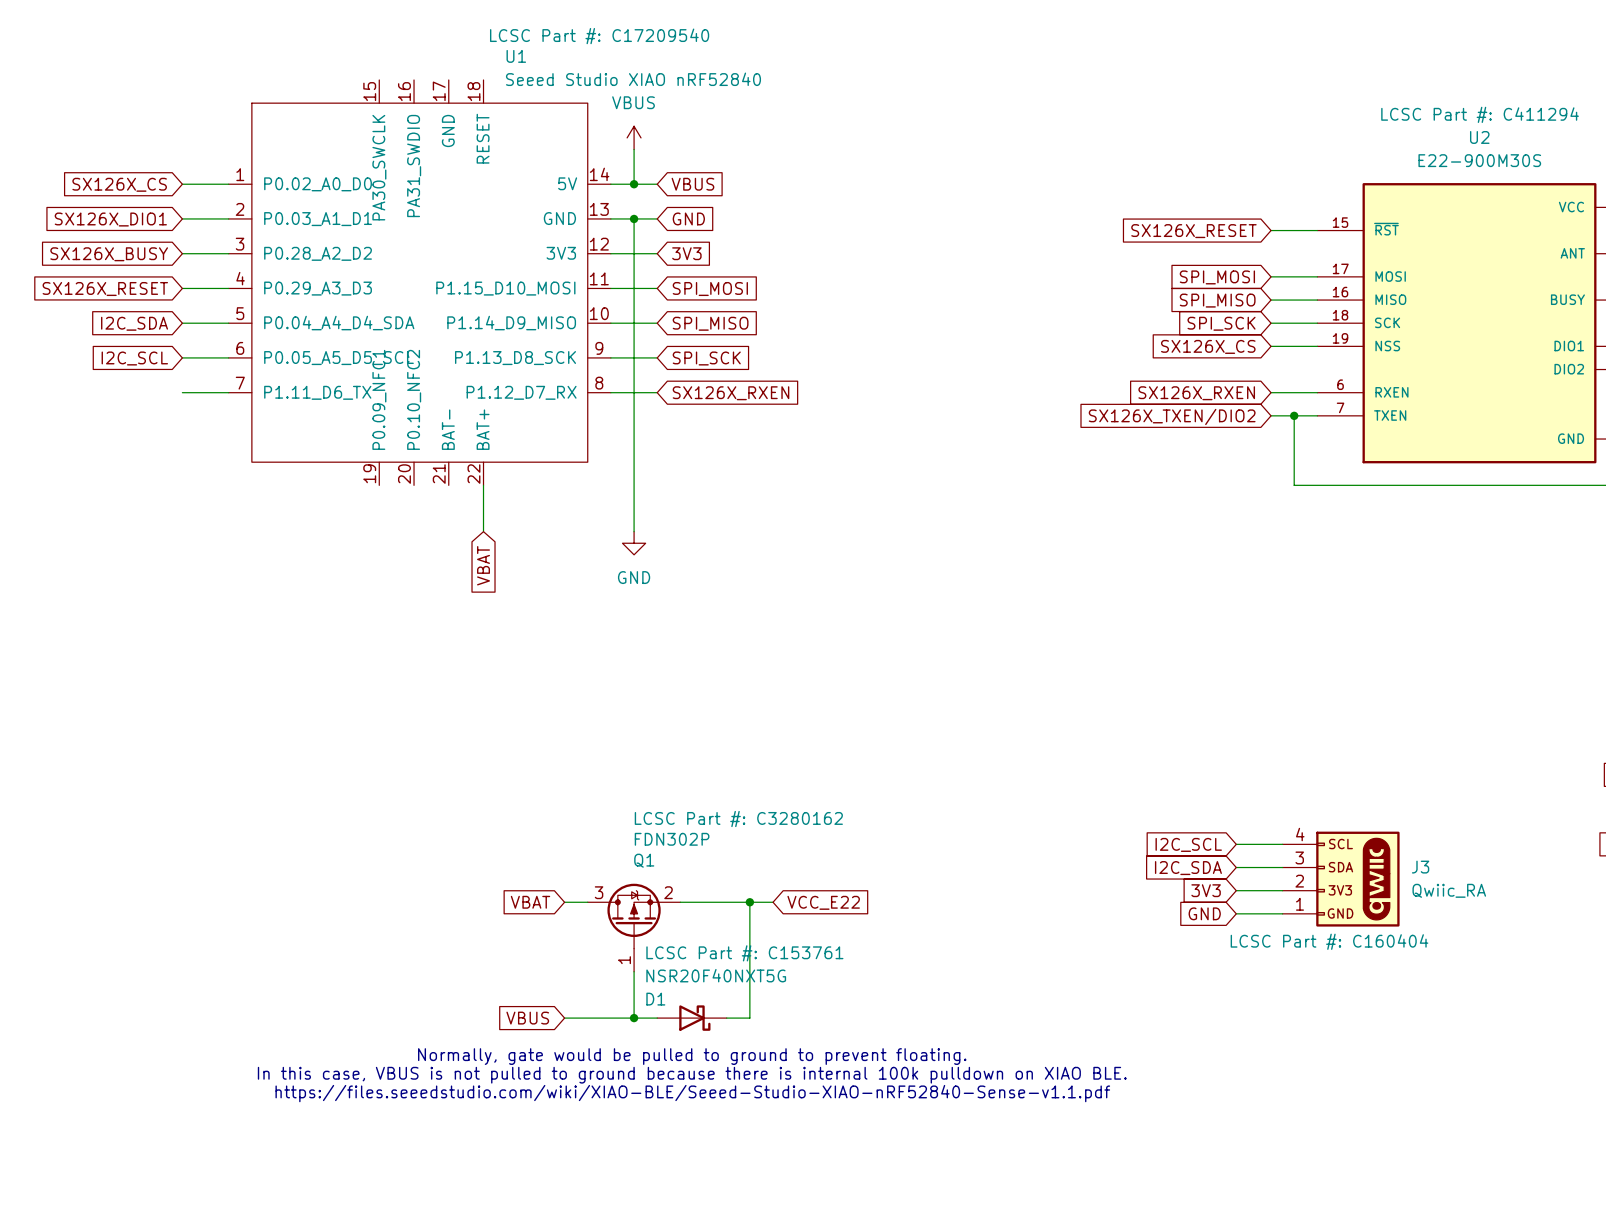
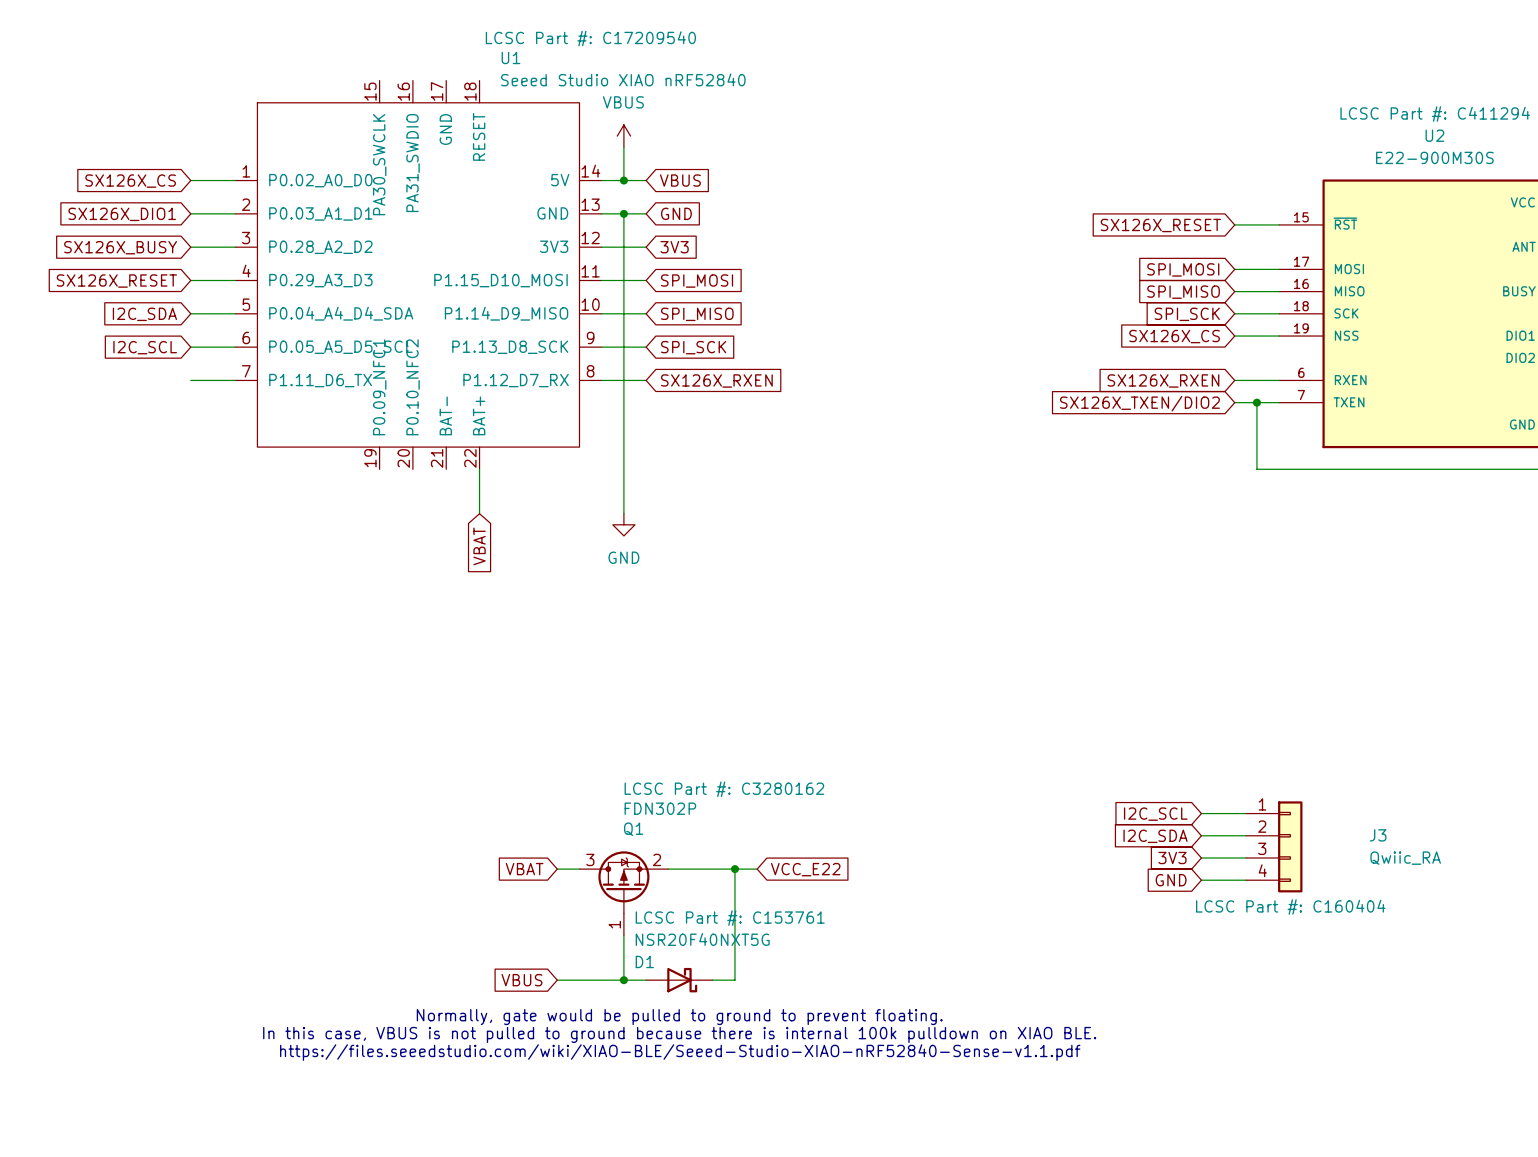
J3 symbol: [1282, 831, 1400, 927] -> [1245, 801, 1303, 893]

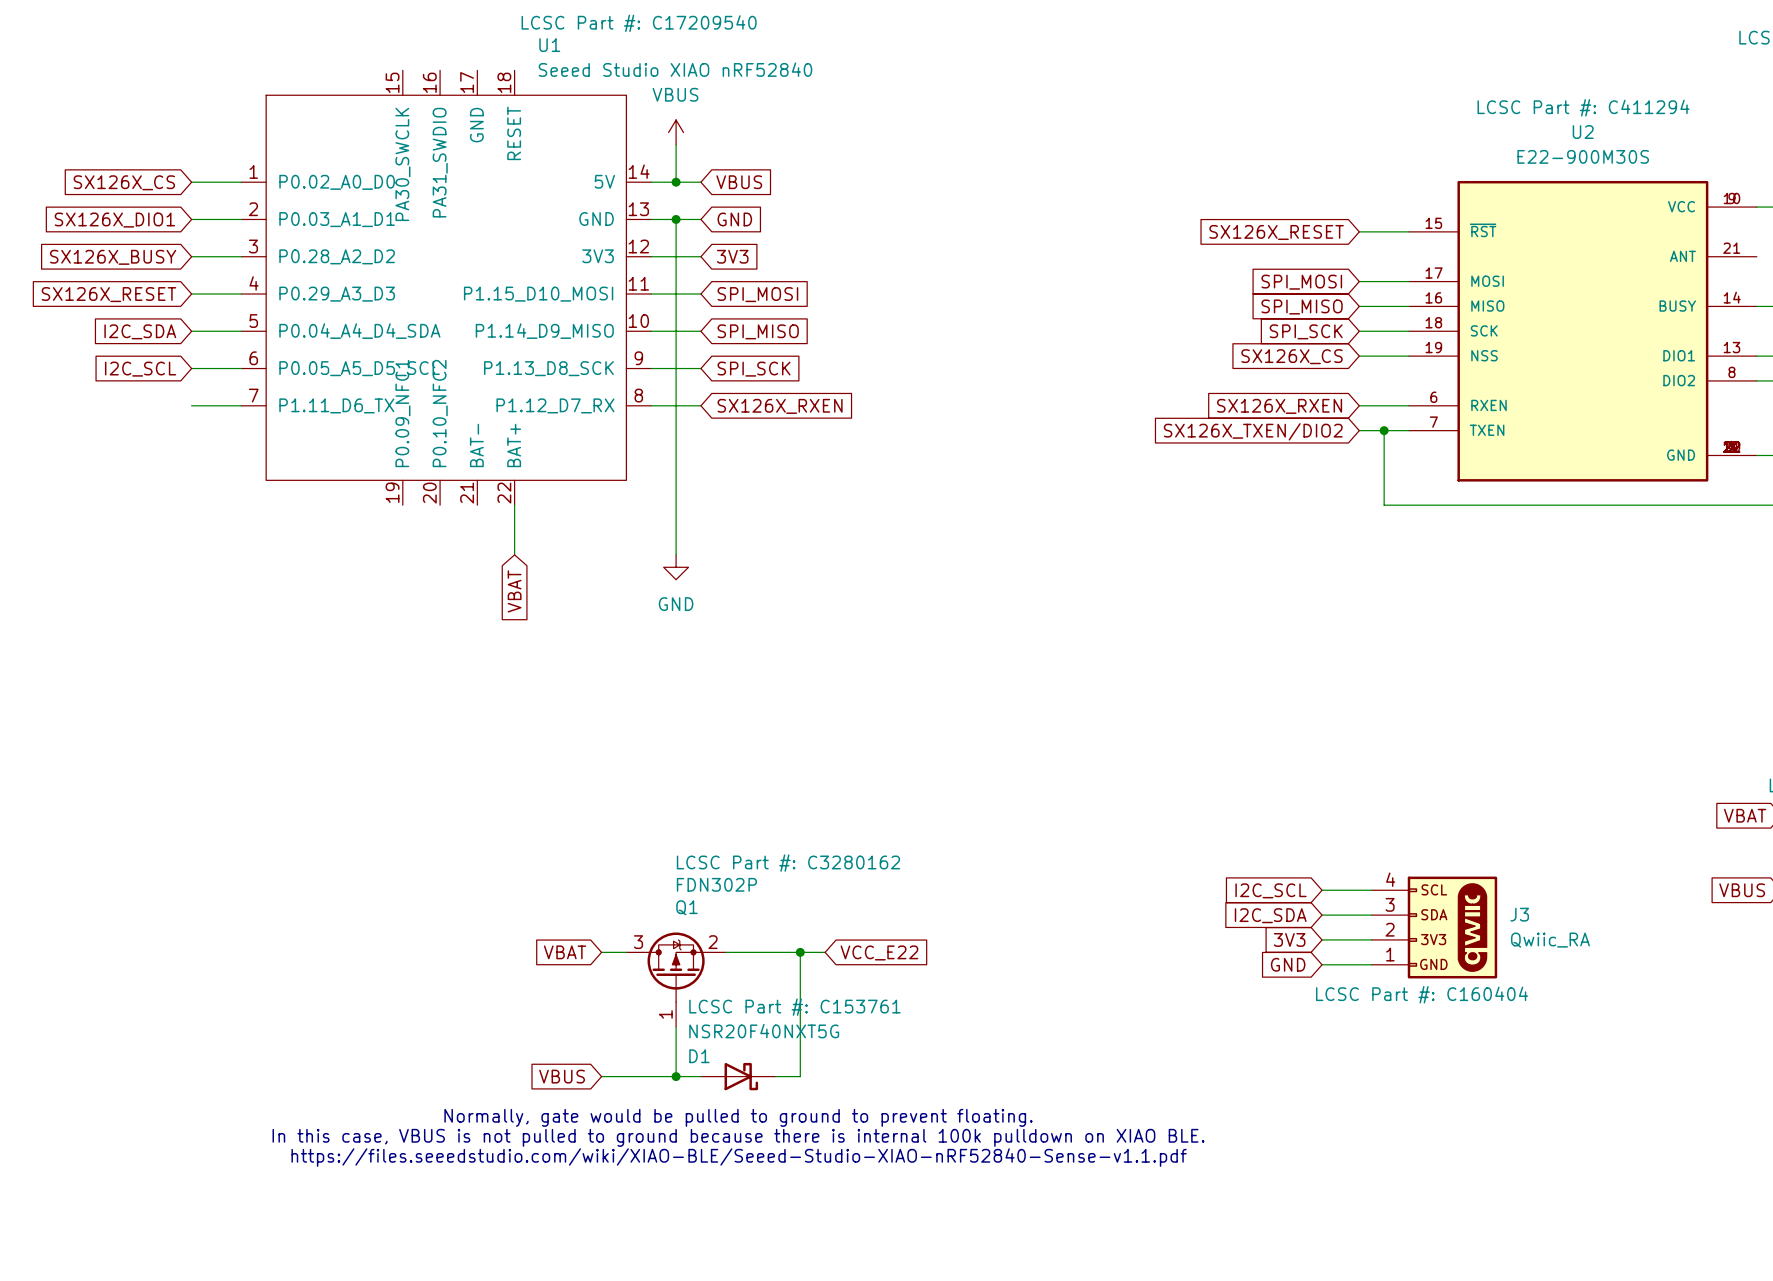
J3 symbol: [1245, 801, 1303, 893] -> [1371, 876, 1498, 979]

